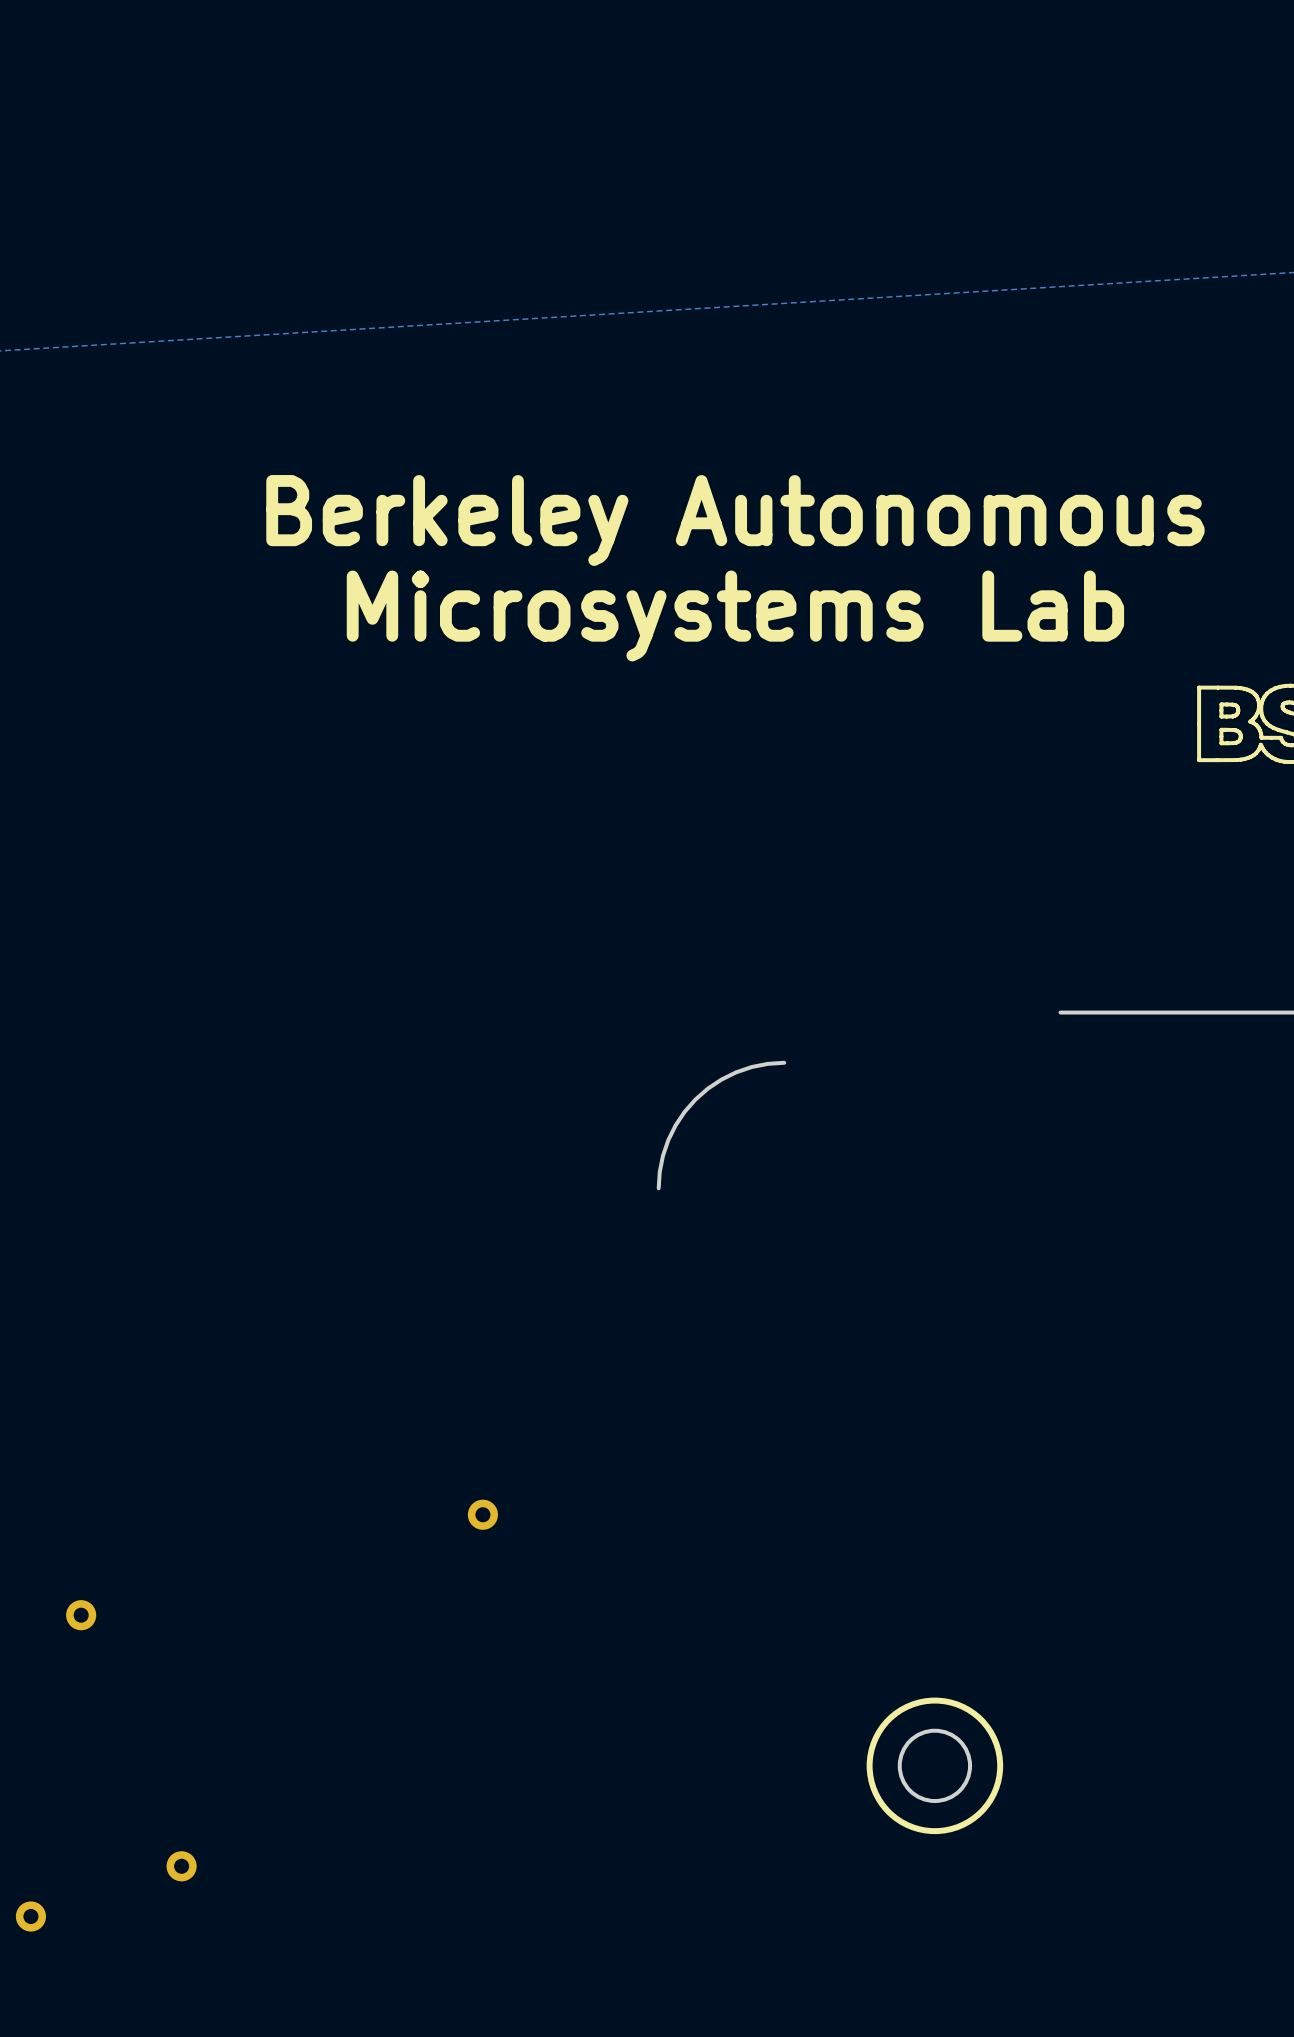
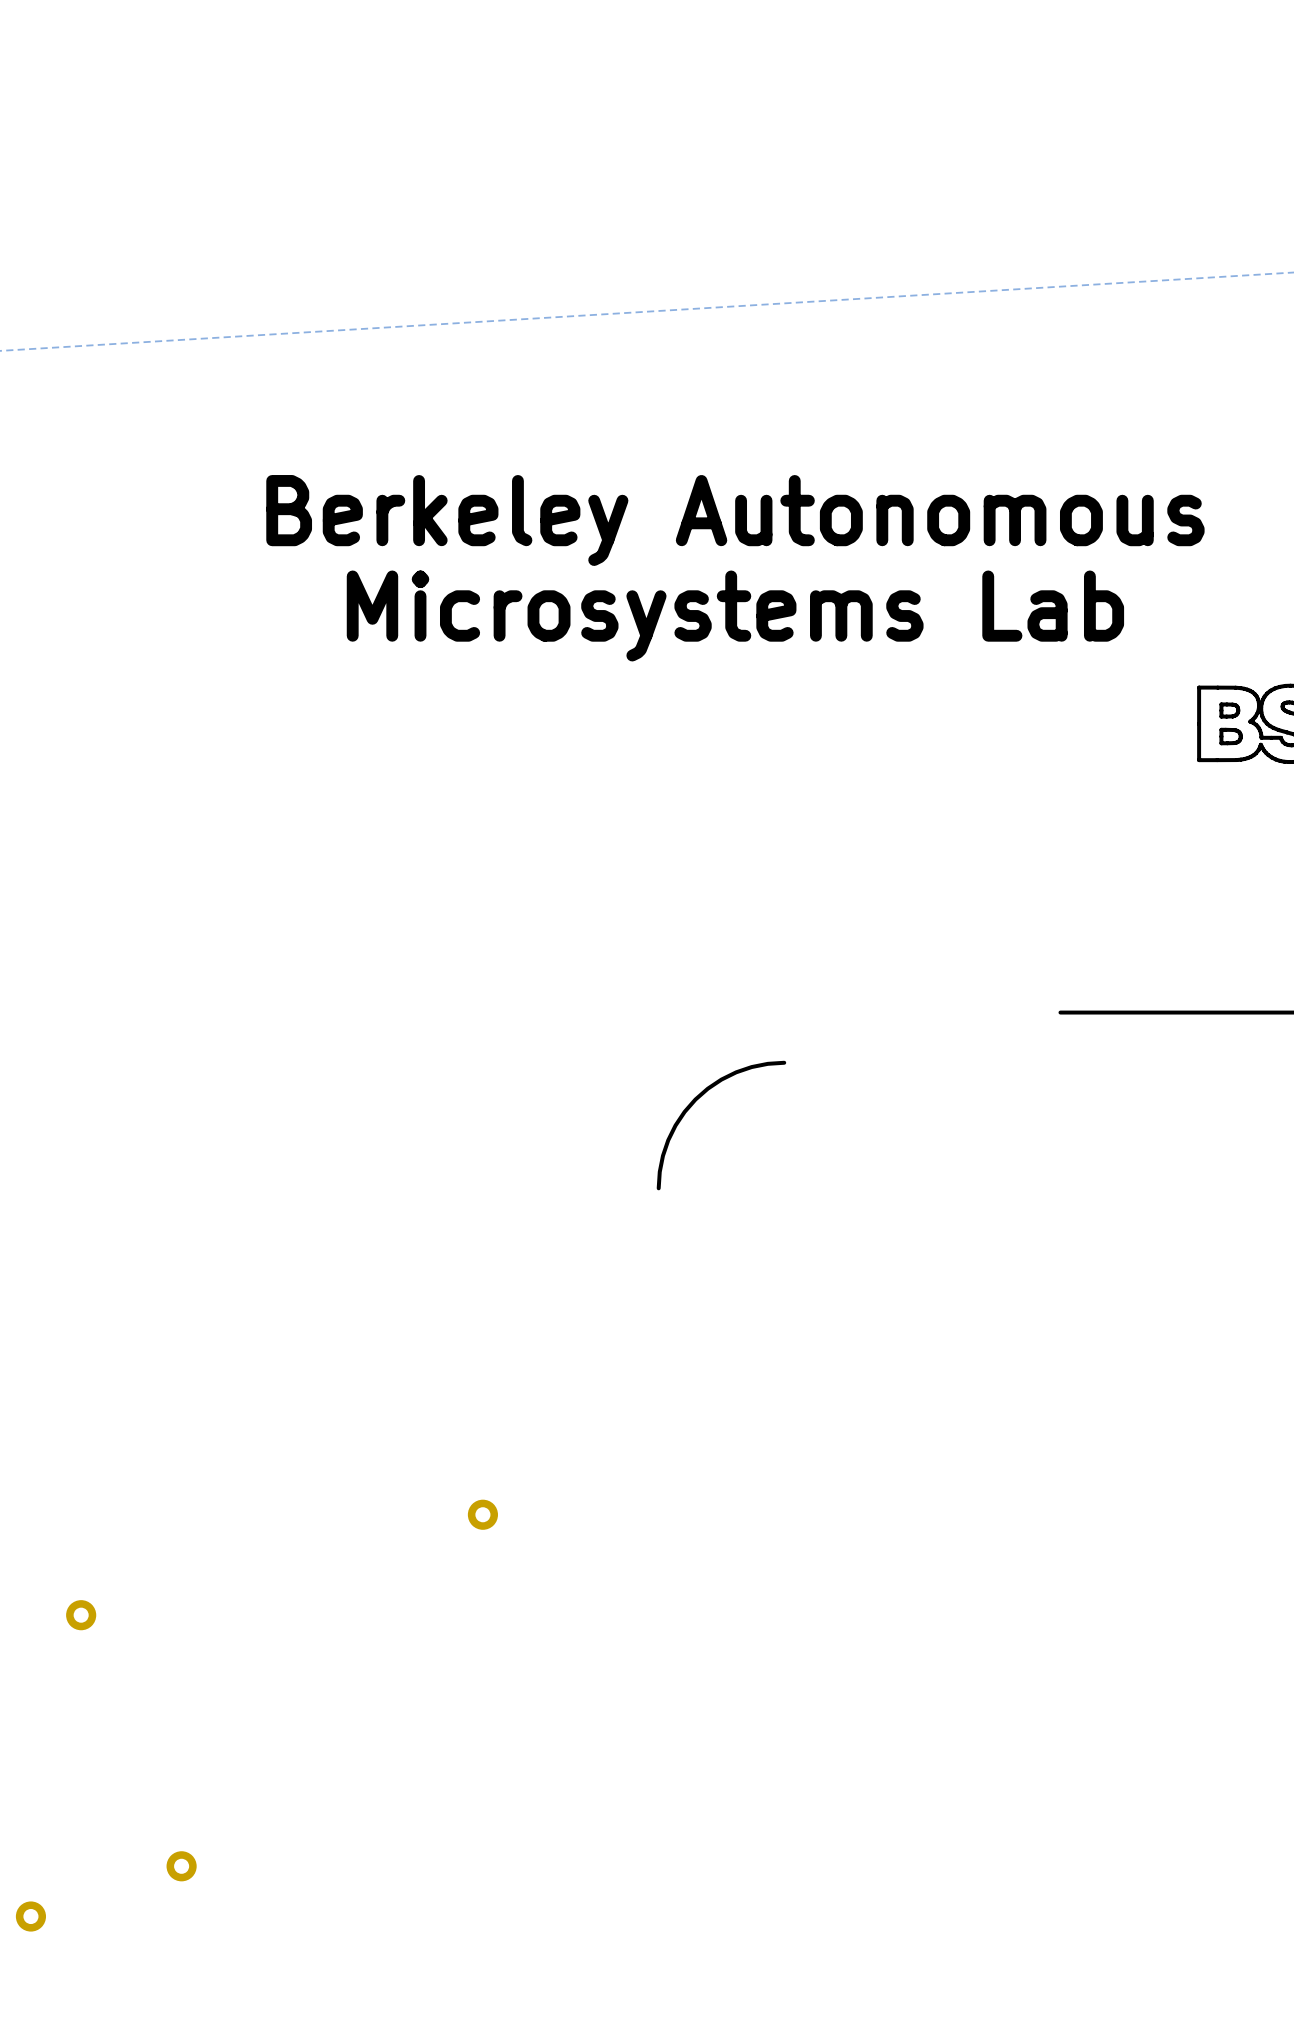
drawing: [866, 1697, 1004, 1835] -> none
round board edge: [897, 1728, 973, 1803] -> none

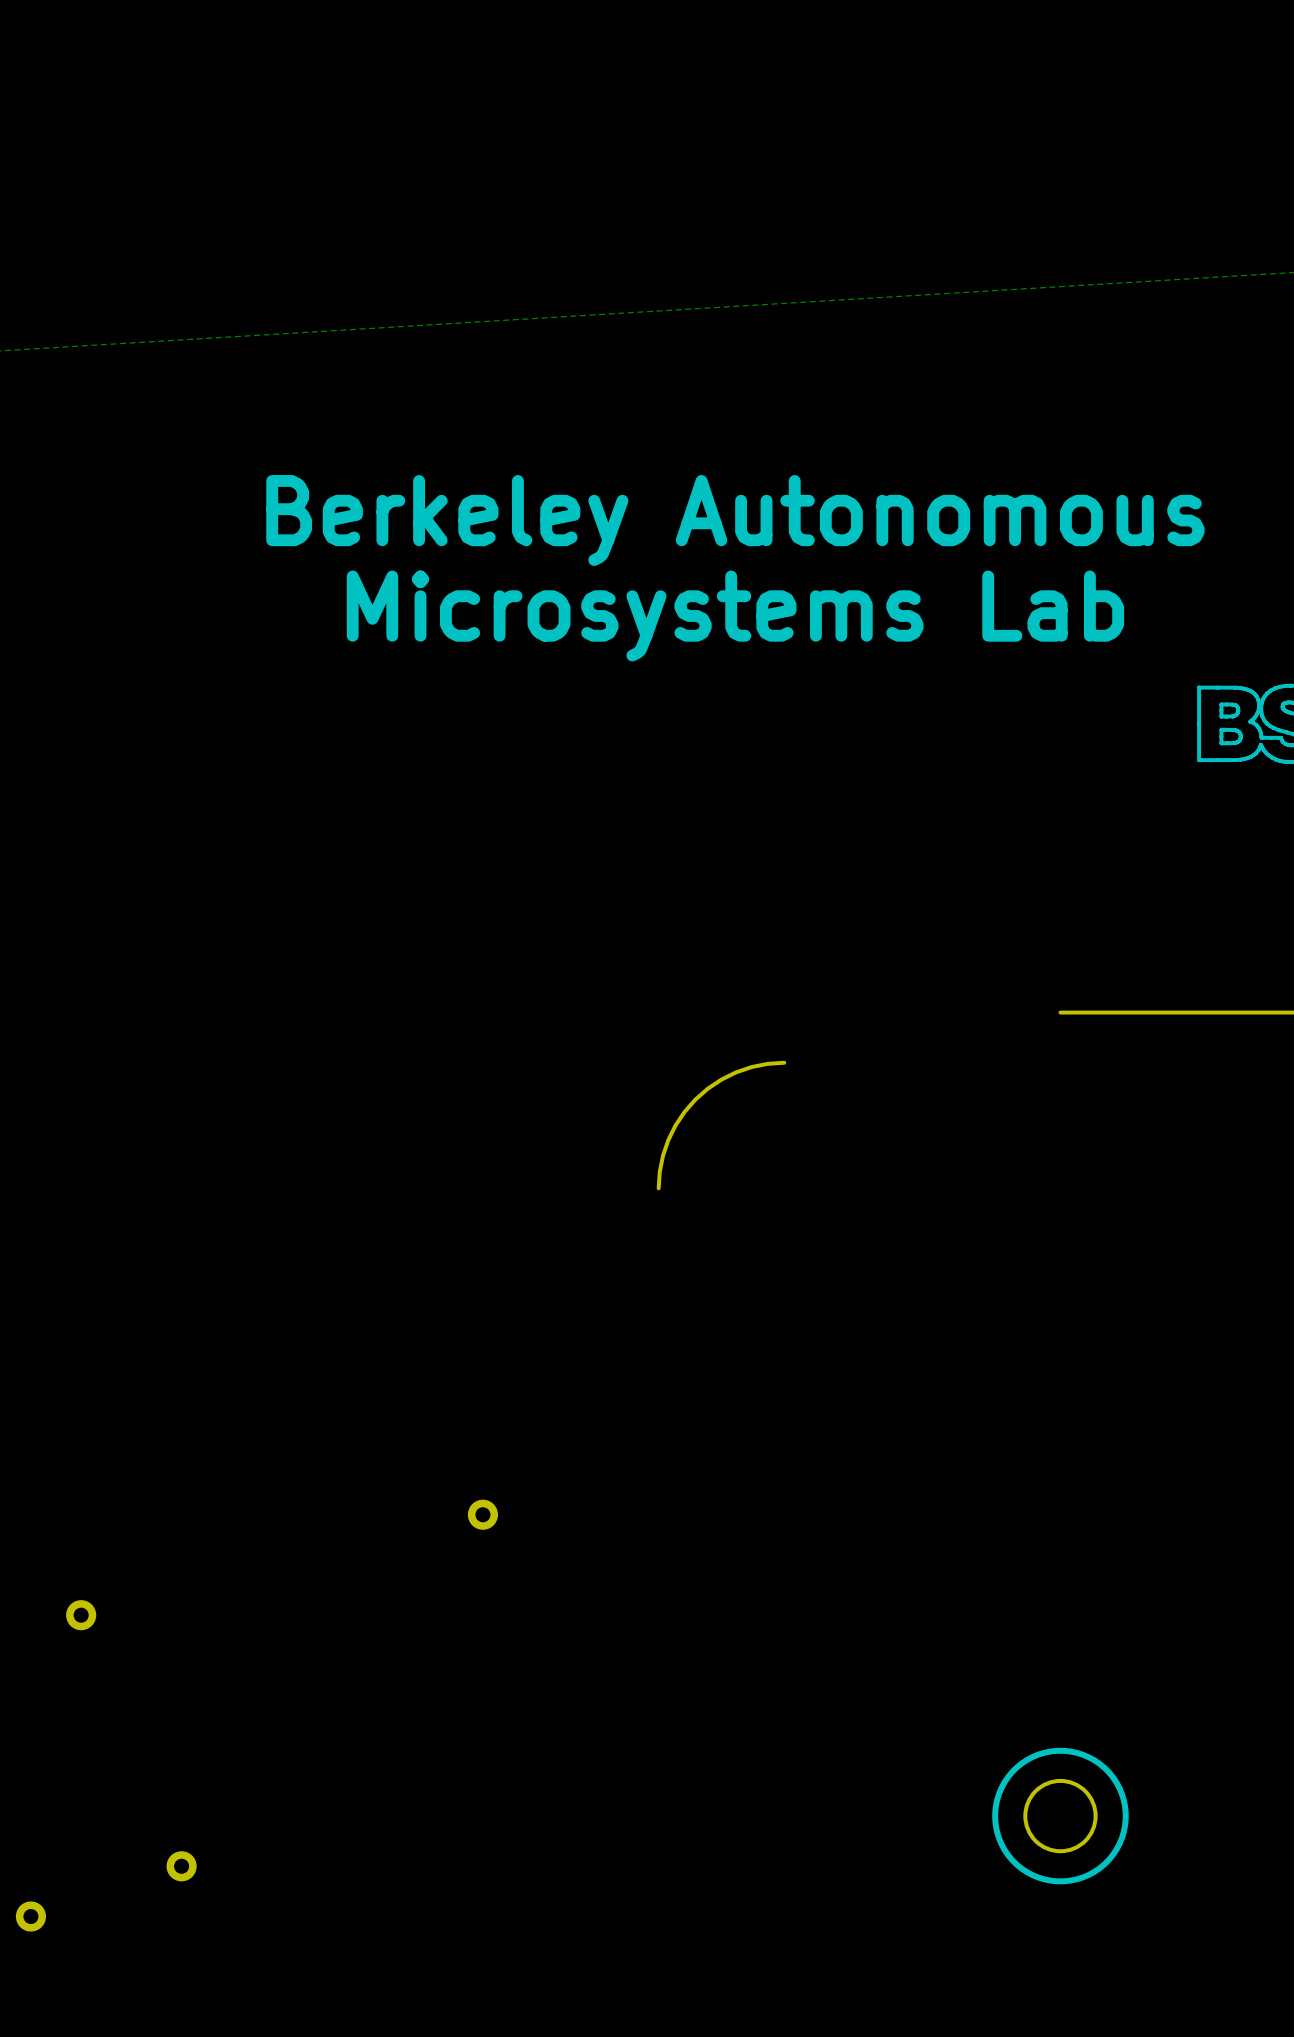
drawing: none -> [992, 1747, 1129, 1885]
round board edge: none -> [1023, 1778, 1098, 1854]

